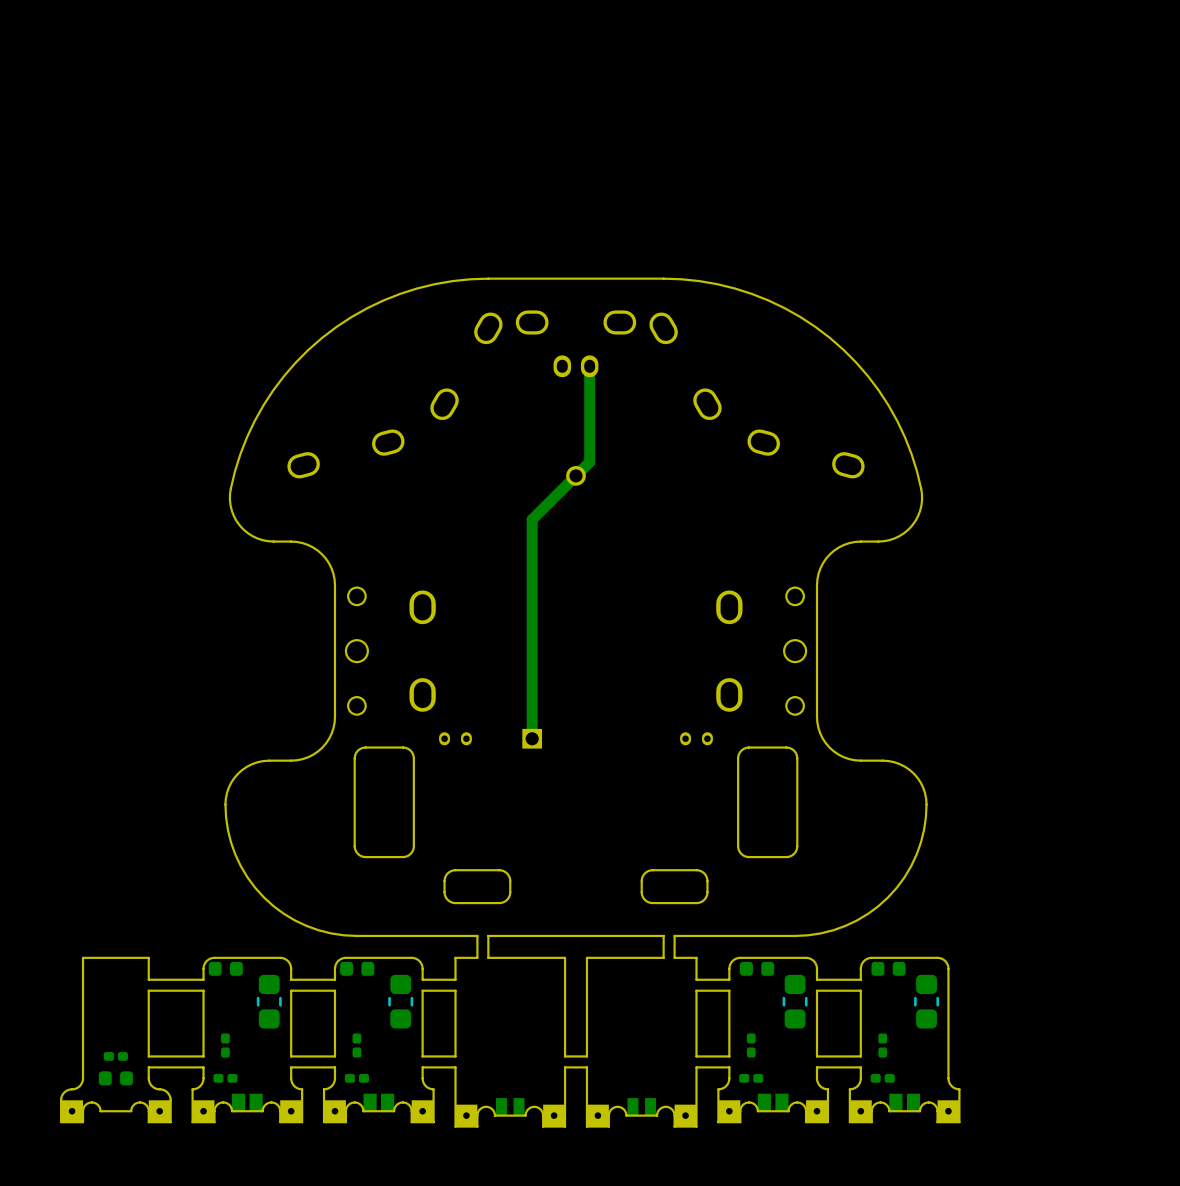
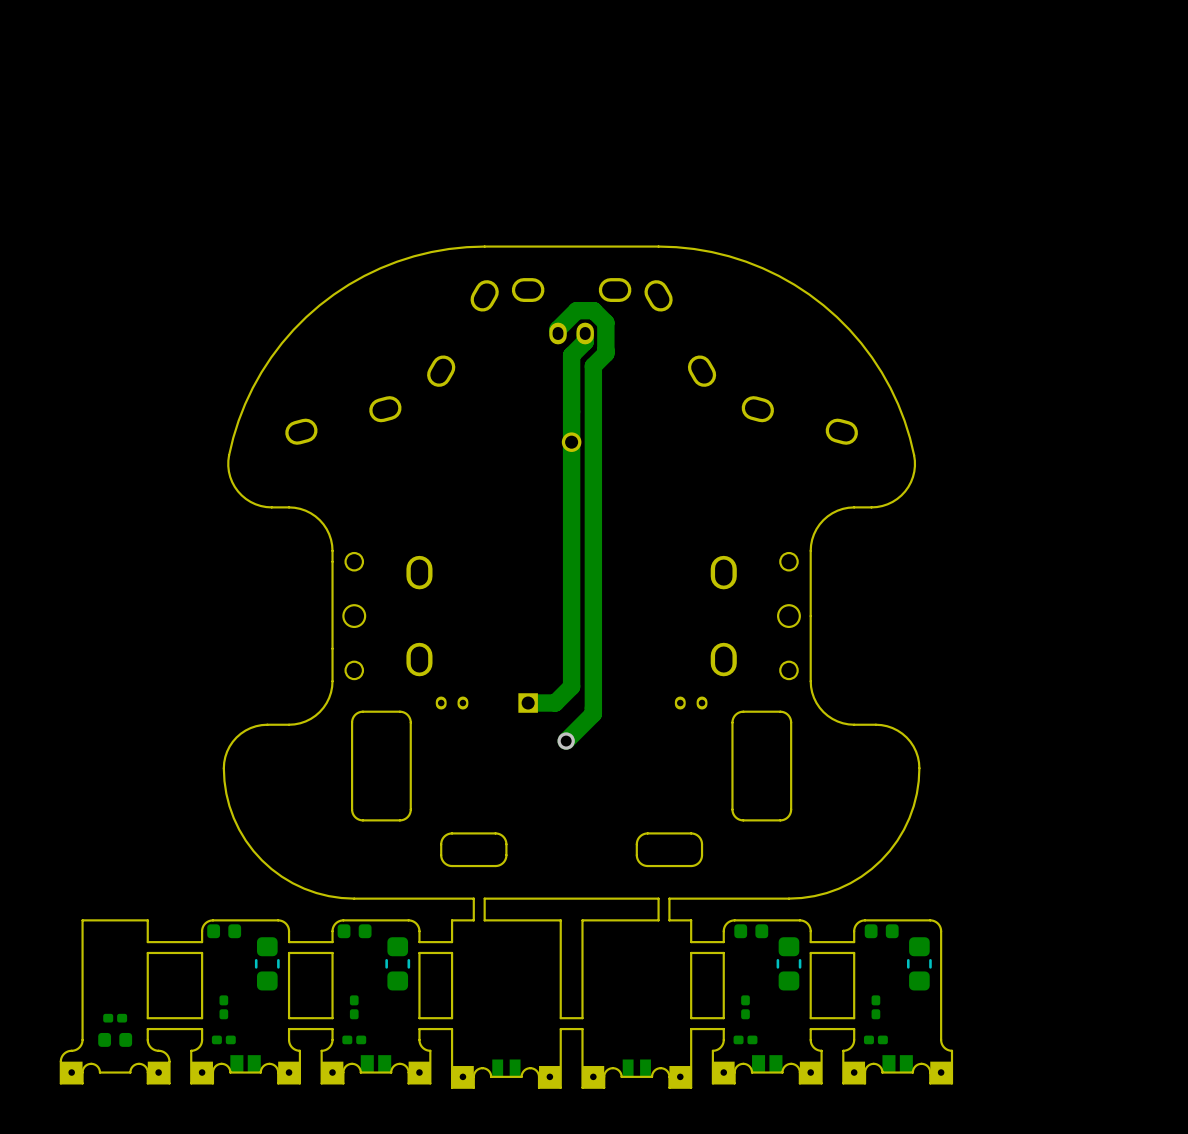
track: none -> (558, 333) (558, 329) (576, 310) (593, 310) (605, 322) (605, 353) (593, 366) (593, 713) (566, 741)
track: (589, 374) (589, 462) (532, 519) (532, 738) -> (585, 341) (571, 355) (571, 686) (555, 703) (528, 703)
via: none -> (566, 741)

